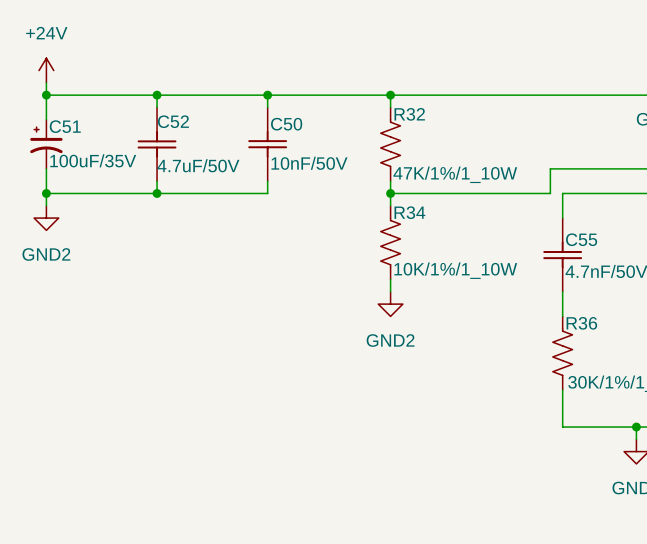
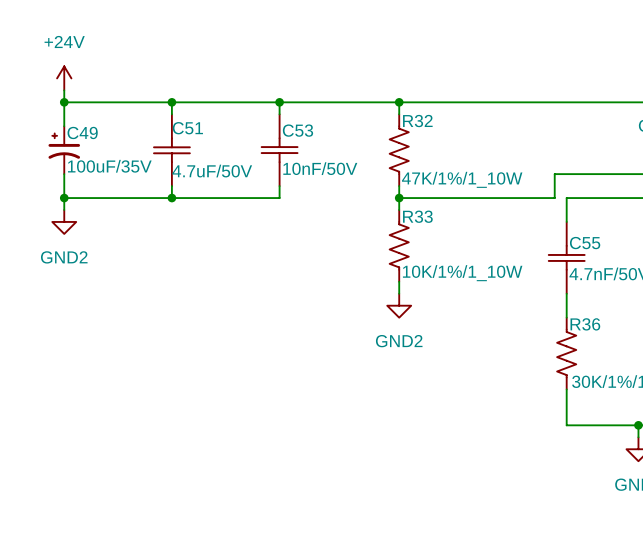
C52 name: C52 (173, 121) -> C51 (187, 128)
C50 name: C50 (286, 124) -> C53 (297, 130)
C51 name: C51 (65, 126) -> C49 (82, 132)
R34 name: R34 (409, 212) -> R33 (417, 216)

